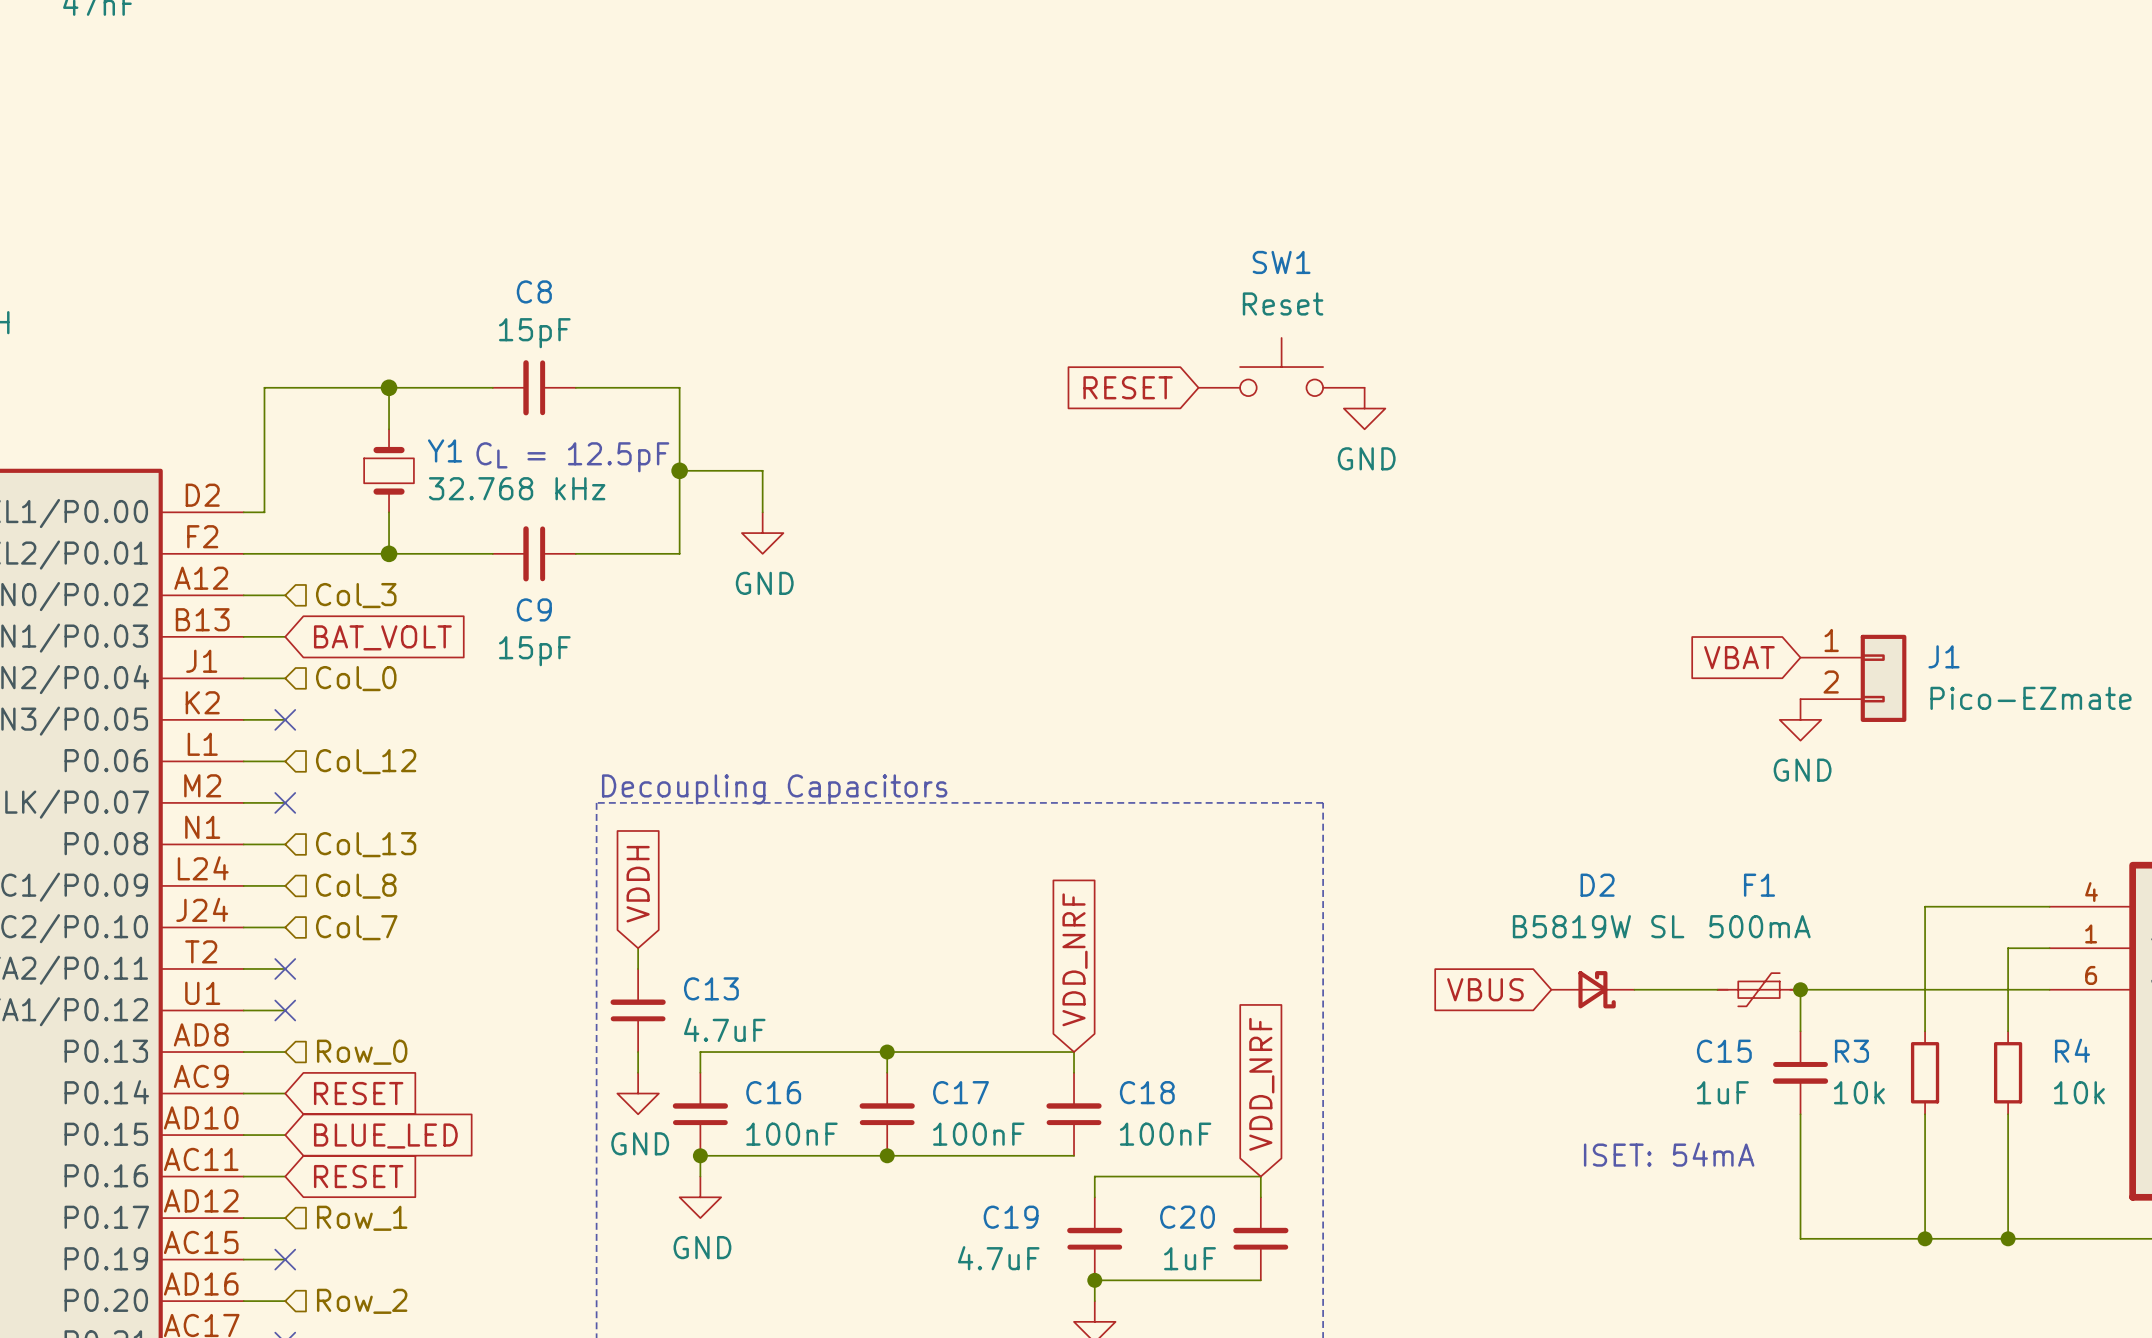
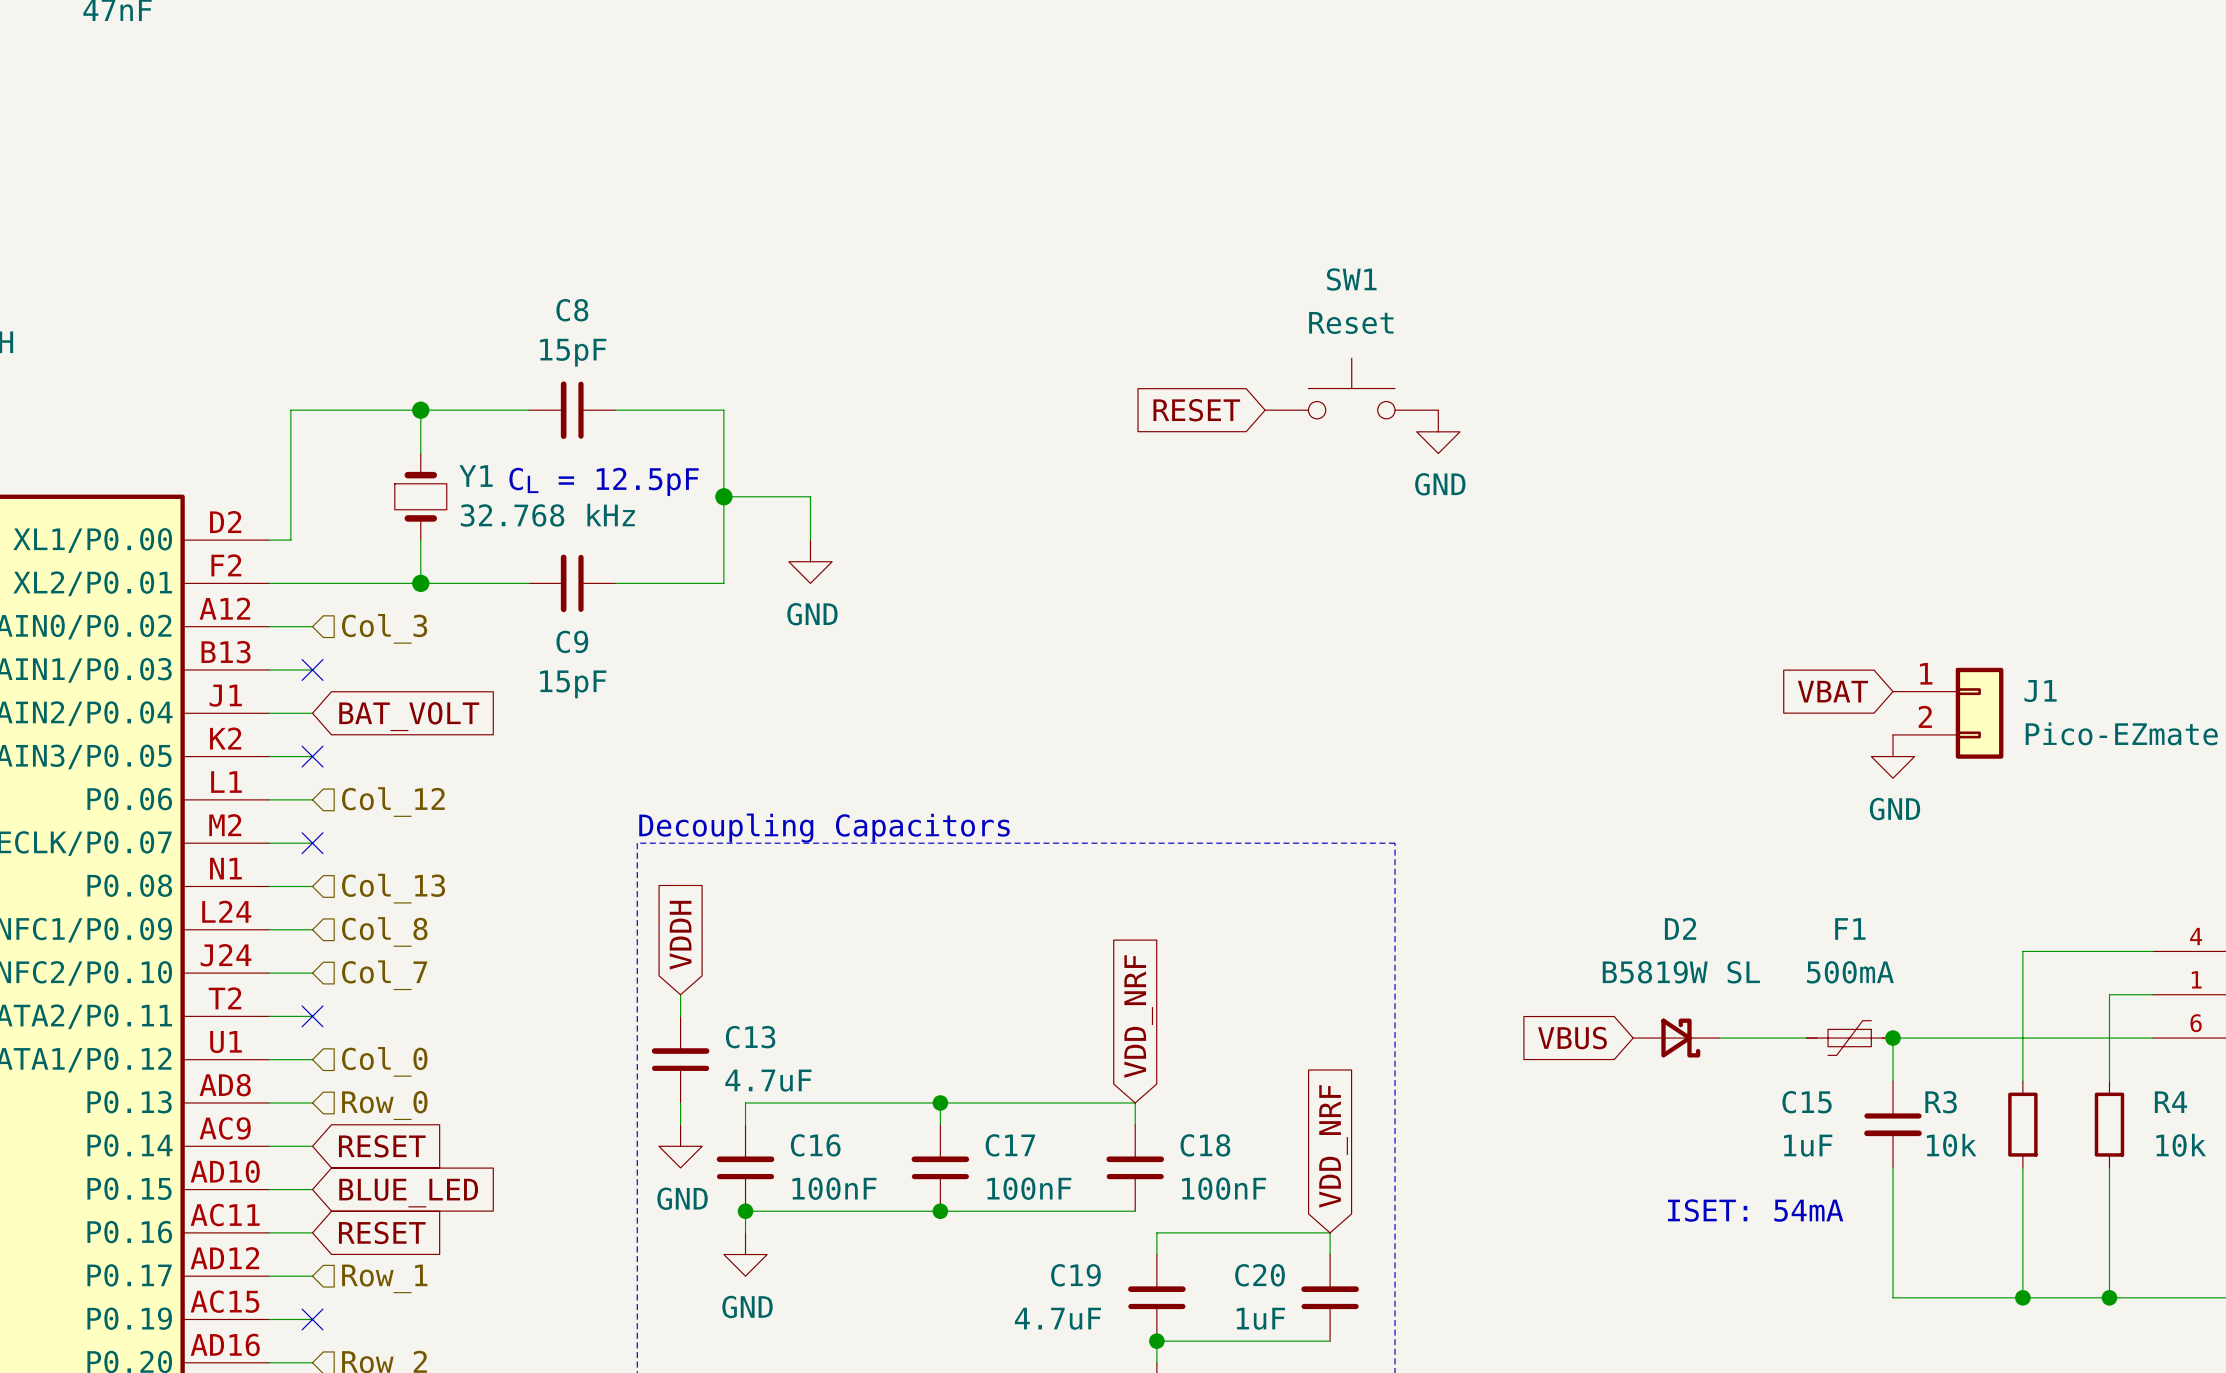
no-connect mark: none -> (312, 669)
global label position: BAT_VOLT (382, 637) -> BAT_VOLT (409, 716)
hierarchical label position: Col_0 (356, 678) -> Col_0 (384, 1061)
no-connect mark: (285, 1010) -> none

